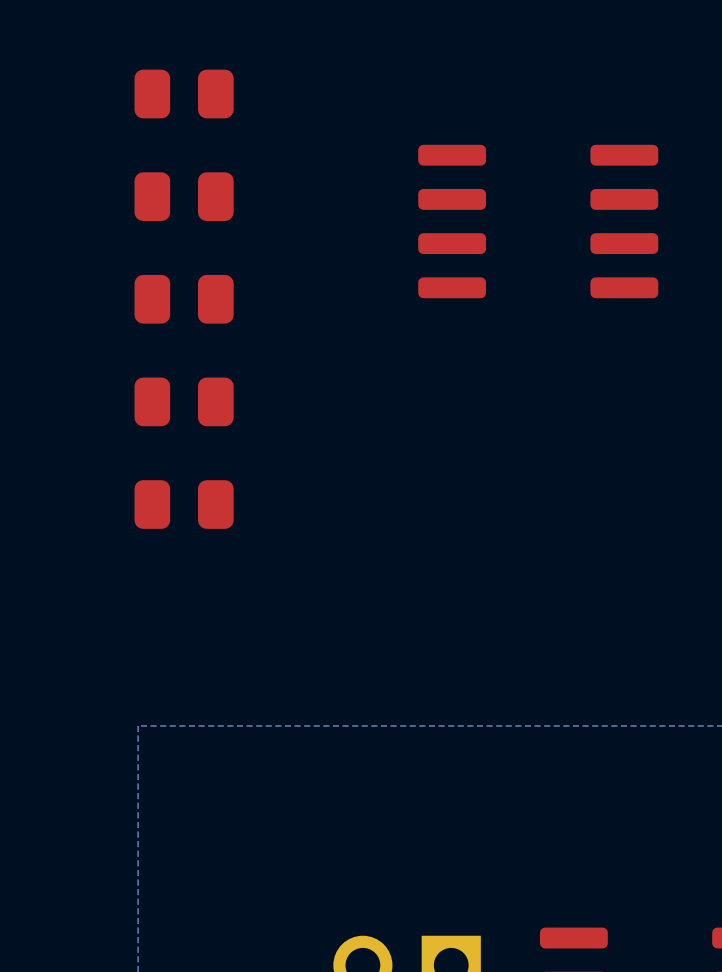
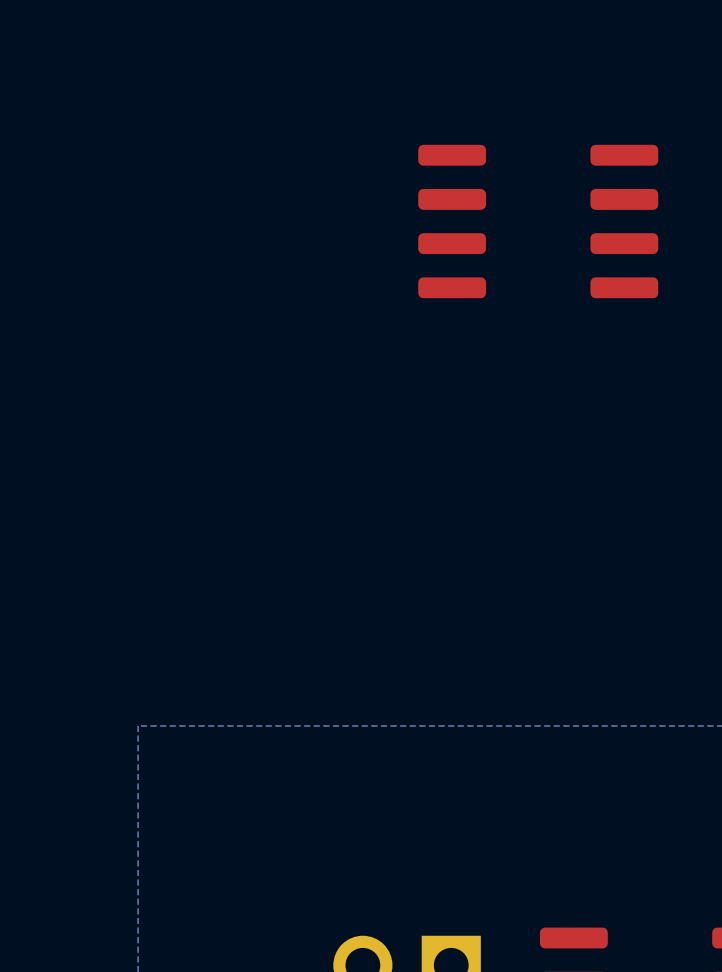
part: (184, 94) -> none
part: (184, 196) -> none
part: (184, 299) -> none
part: (184, 401) -> none
part: (184, 504) -> none

